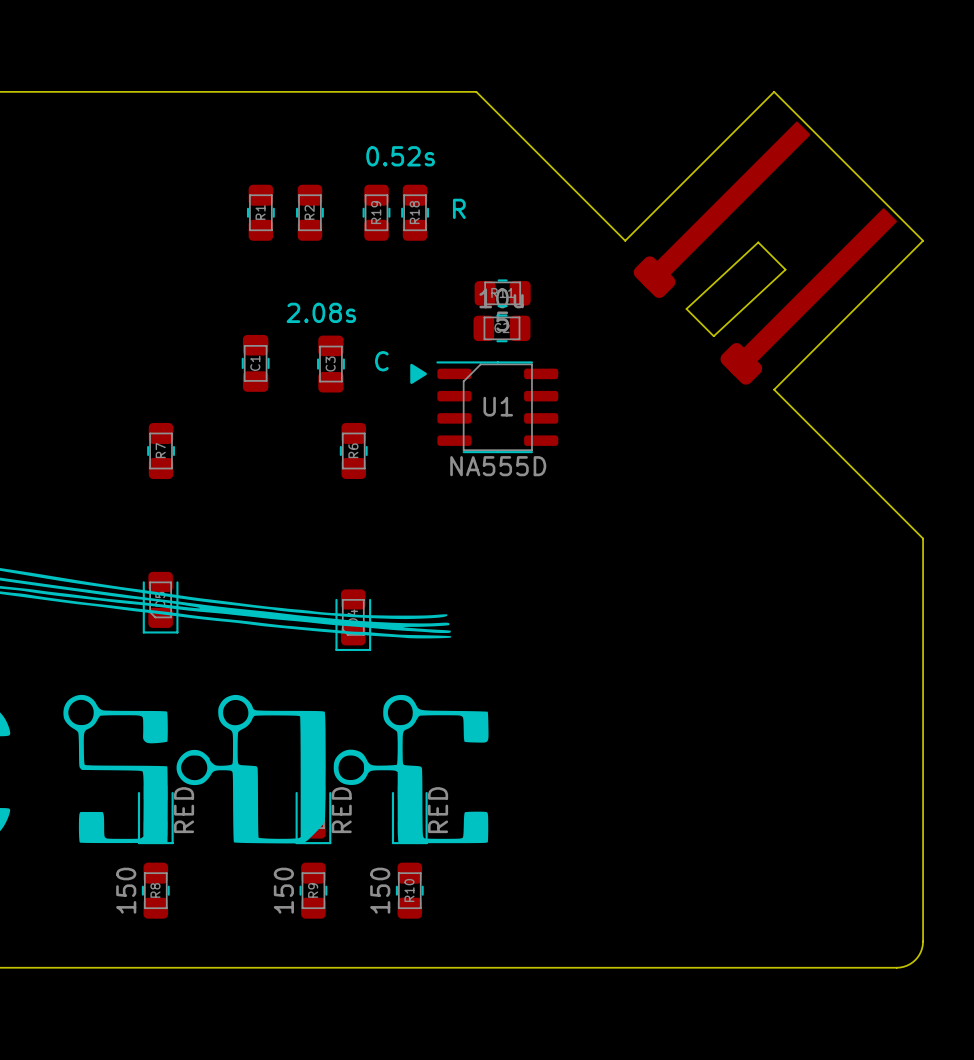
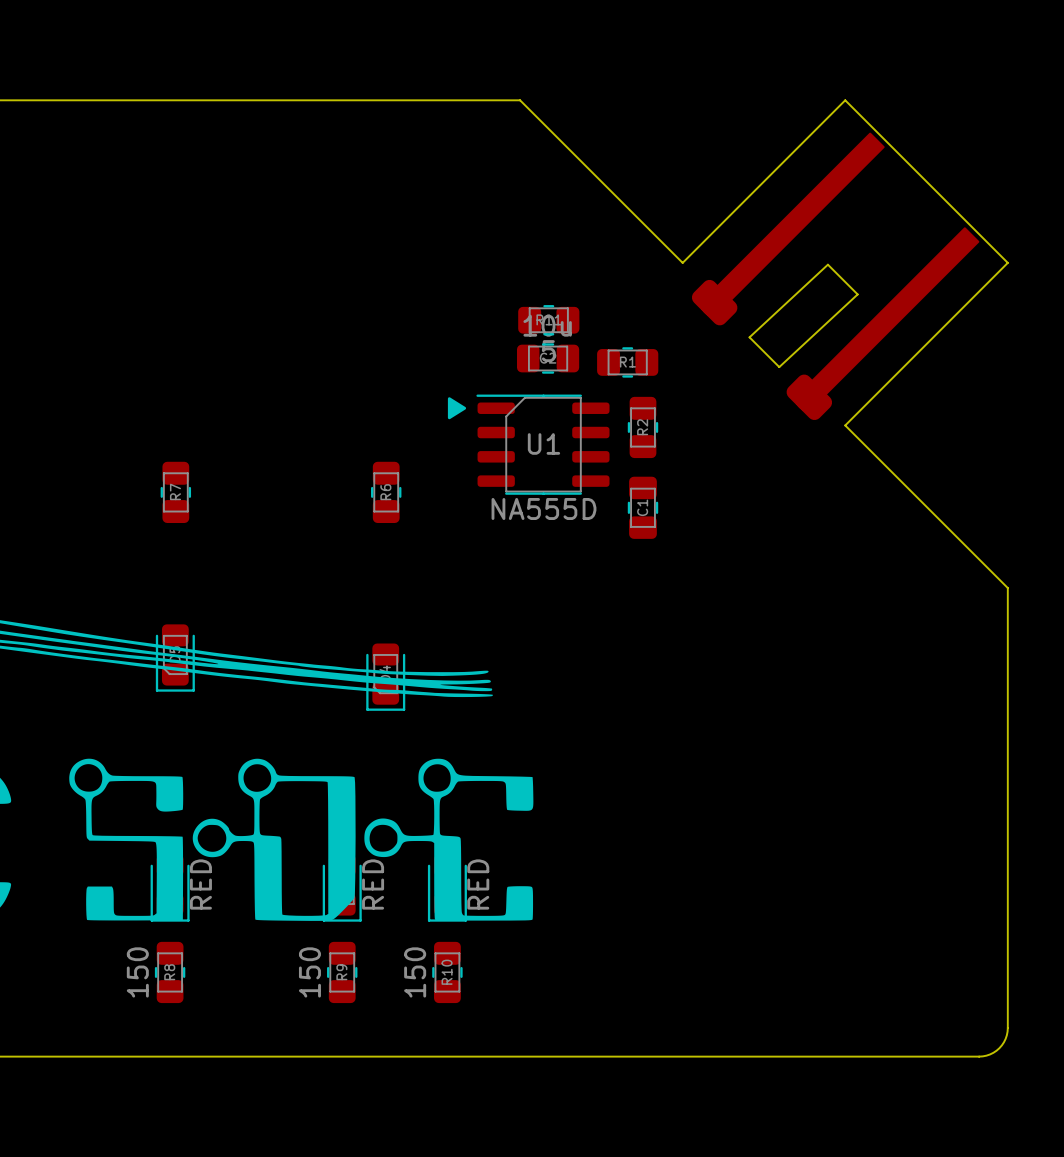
text: 0.52s (400, 156) -> none
text: R (459, 208) -> none
R1 rotation: 0° (260, 212) -> 90° clockwise (627, 362)
R1 position: (260, 212) -> (627, 362)
R2 position: (309, 212) -> (642, 427)
R19: (376, 212) -> none
R18: (415, 212) -> none
text: 2.08s (321, 312) -> none
text: C (381, 361) -> none
C1 position: (255, 363) -> (642, 507)
C3: (330, 364) -> none

